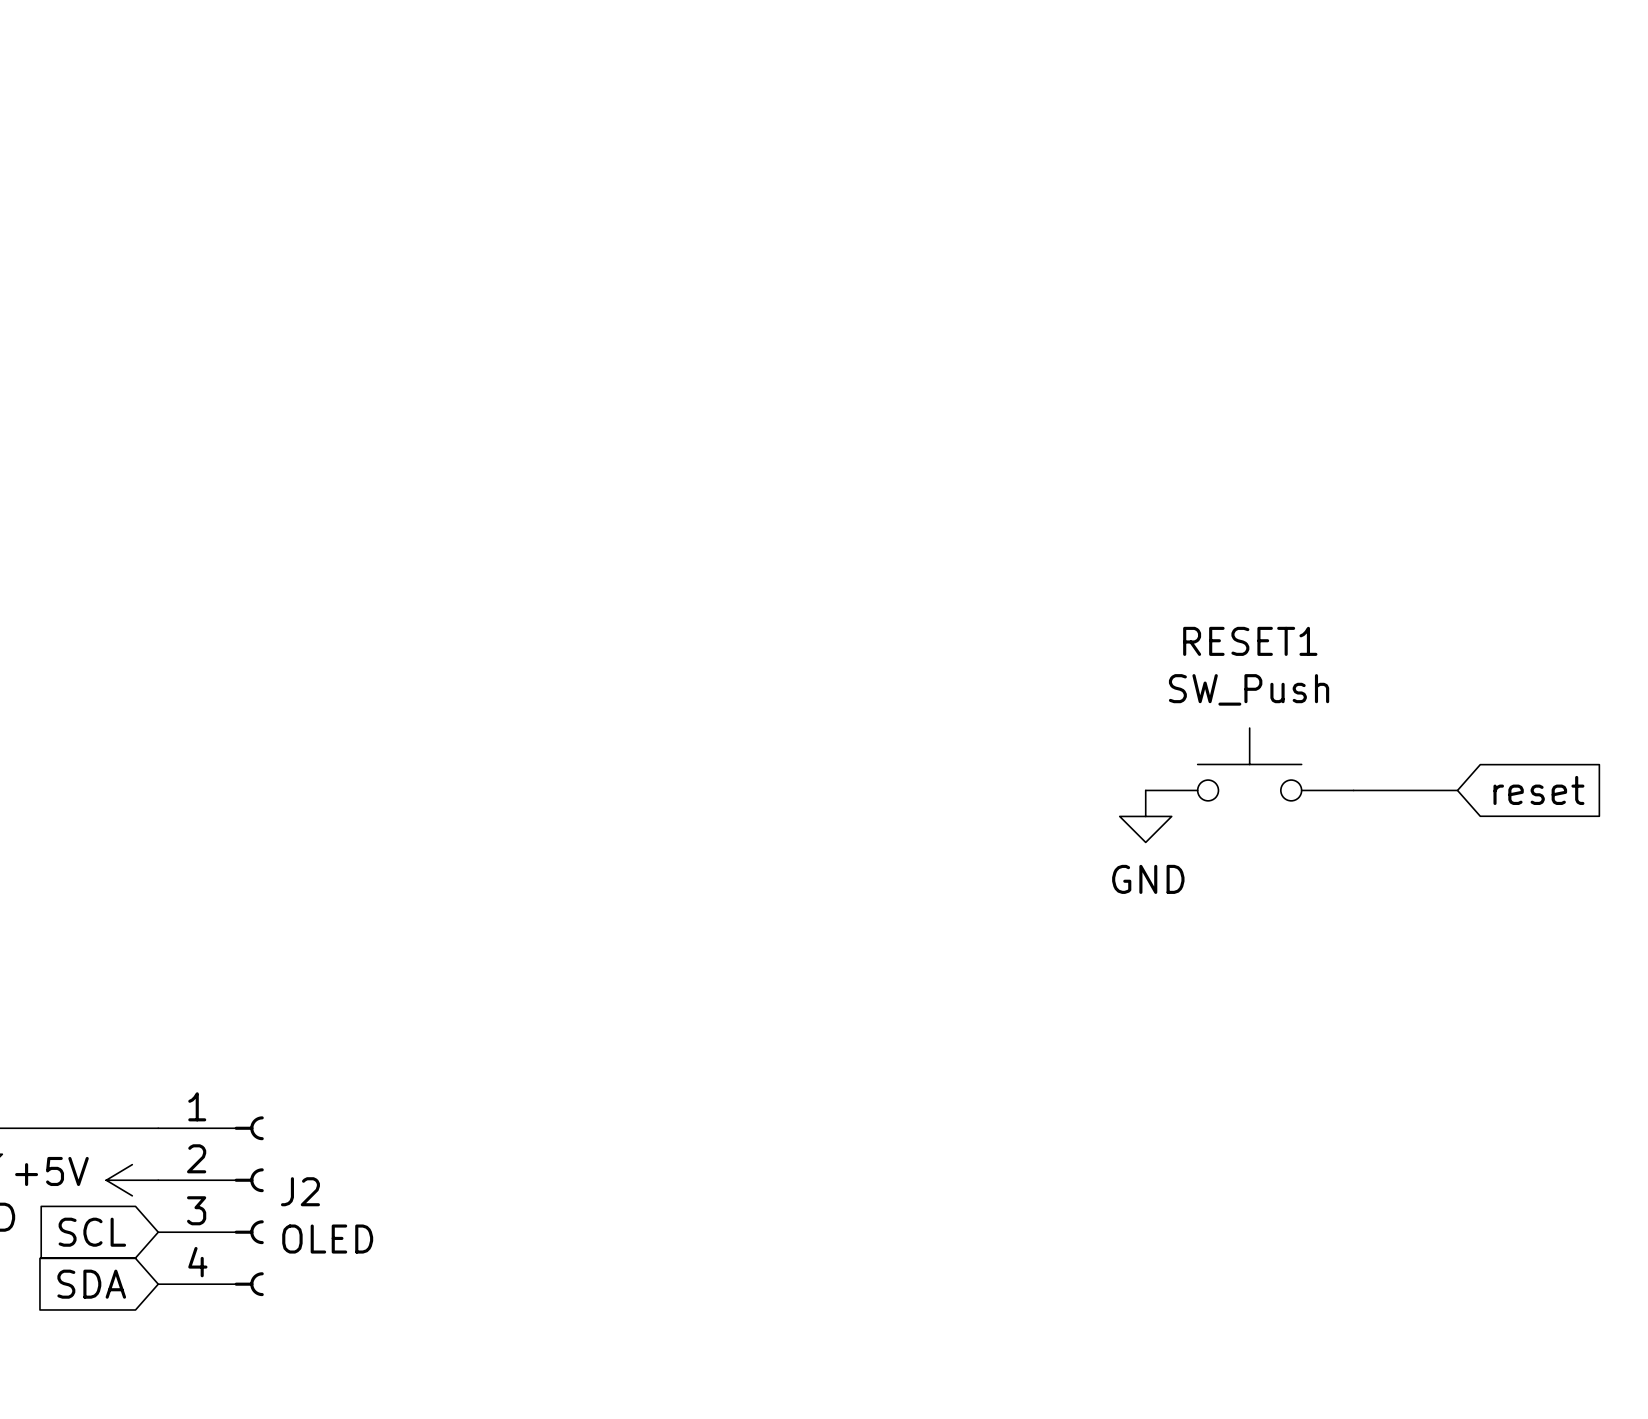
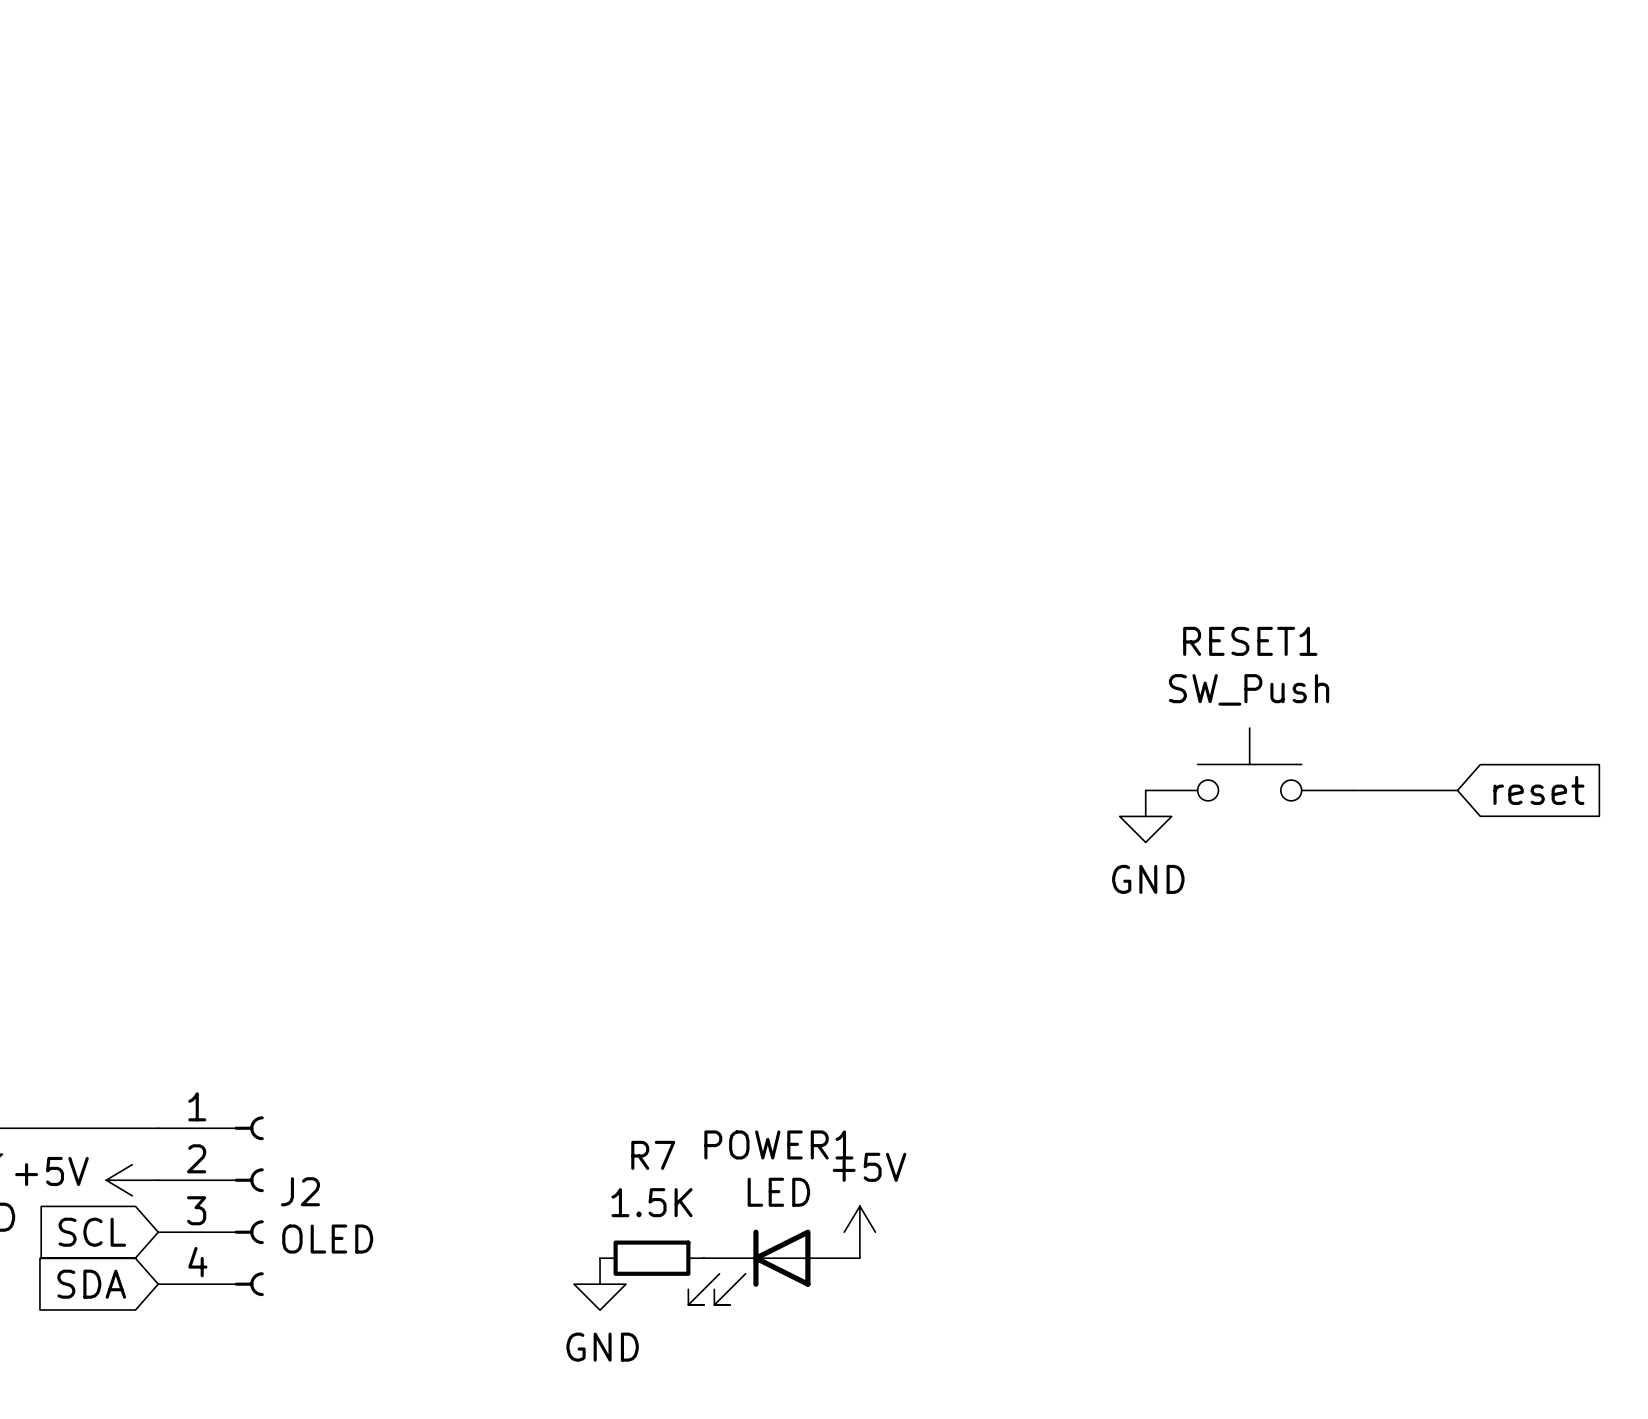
power symbol: none -> +5V (859, 1232)
R7: none -> 1.5K (651, 1258)
POWER1: none -> LED (774, 1267)
power symbol: none -> GND (600, 1284)

